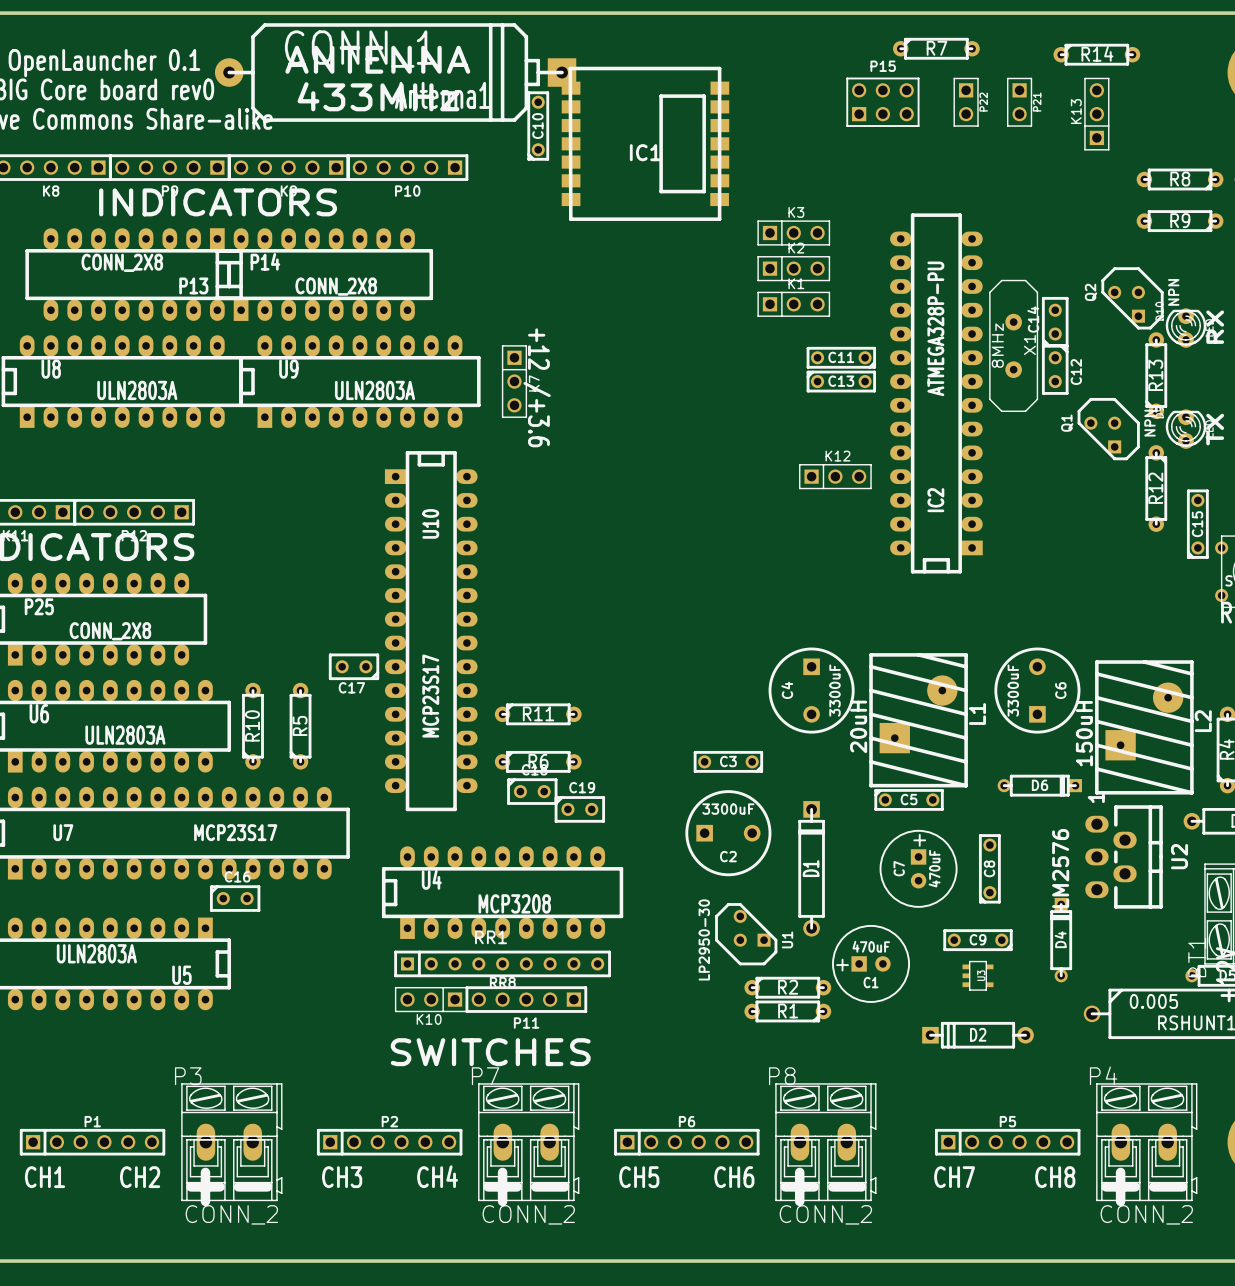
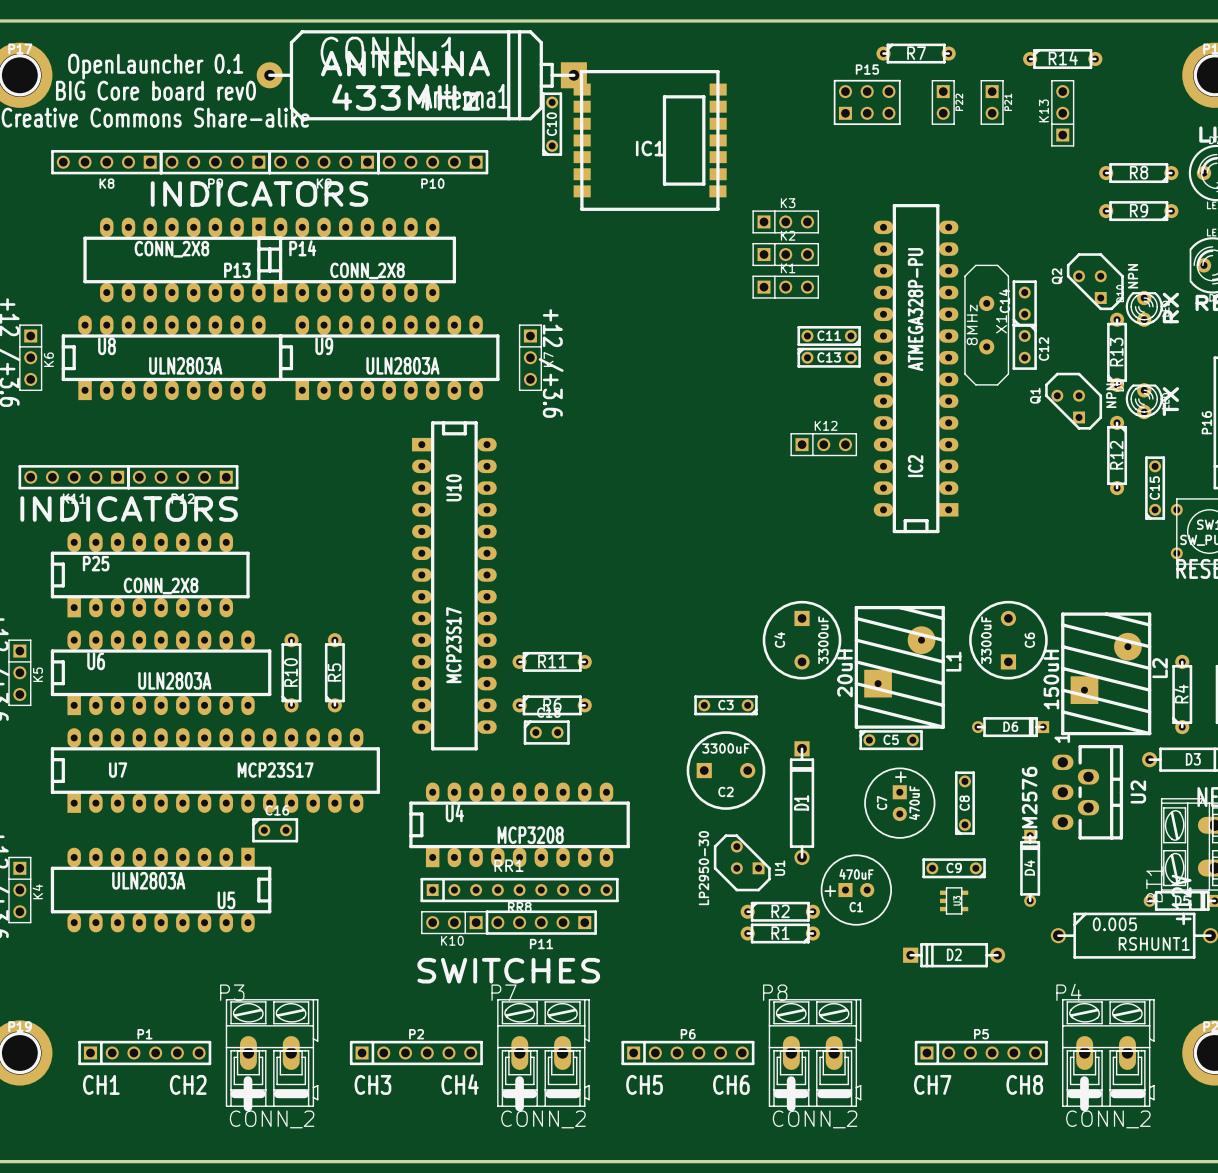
C17: (354, 666) -> none
C19: (579, 809) -> none

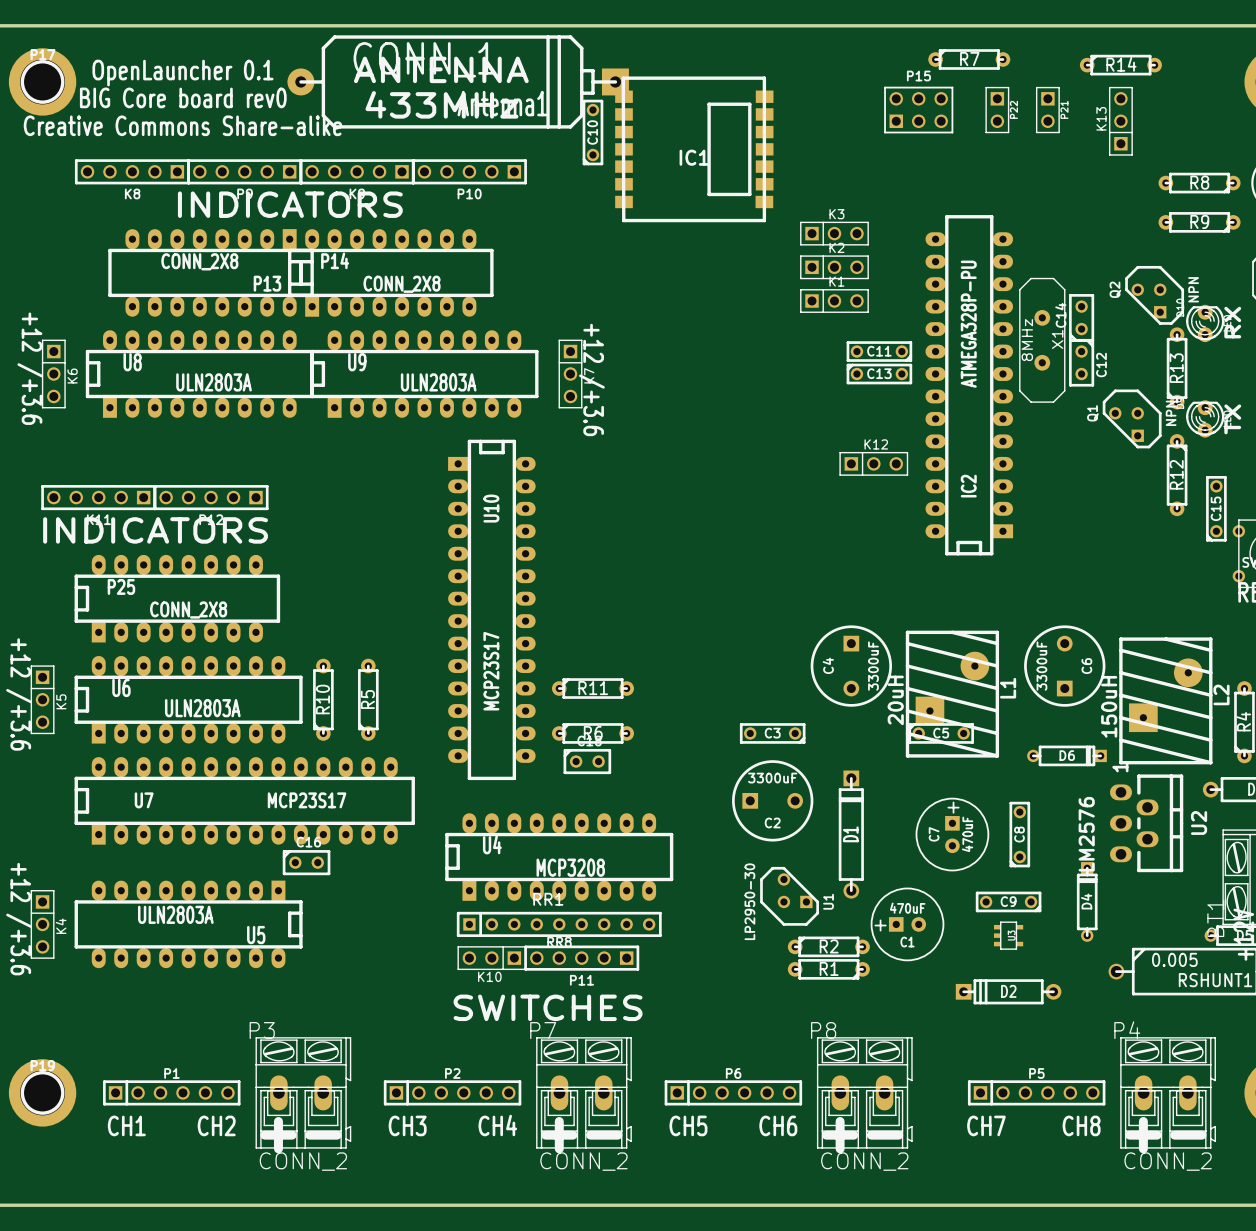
C5 position: (891, 740) -> (941, 733)

